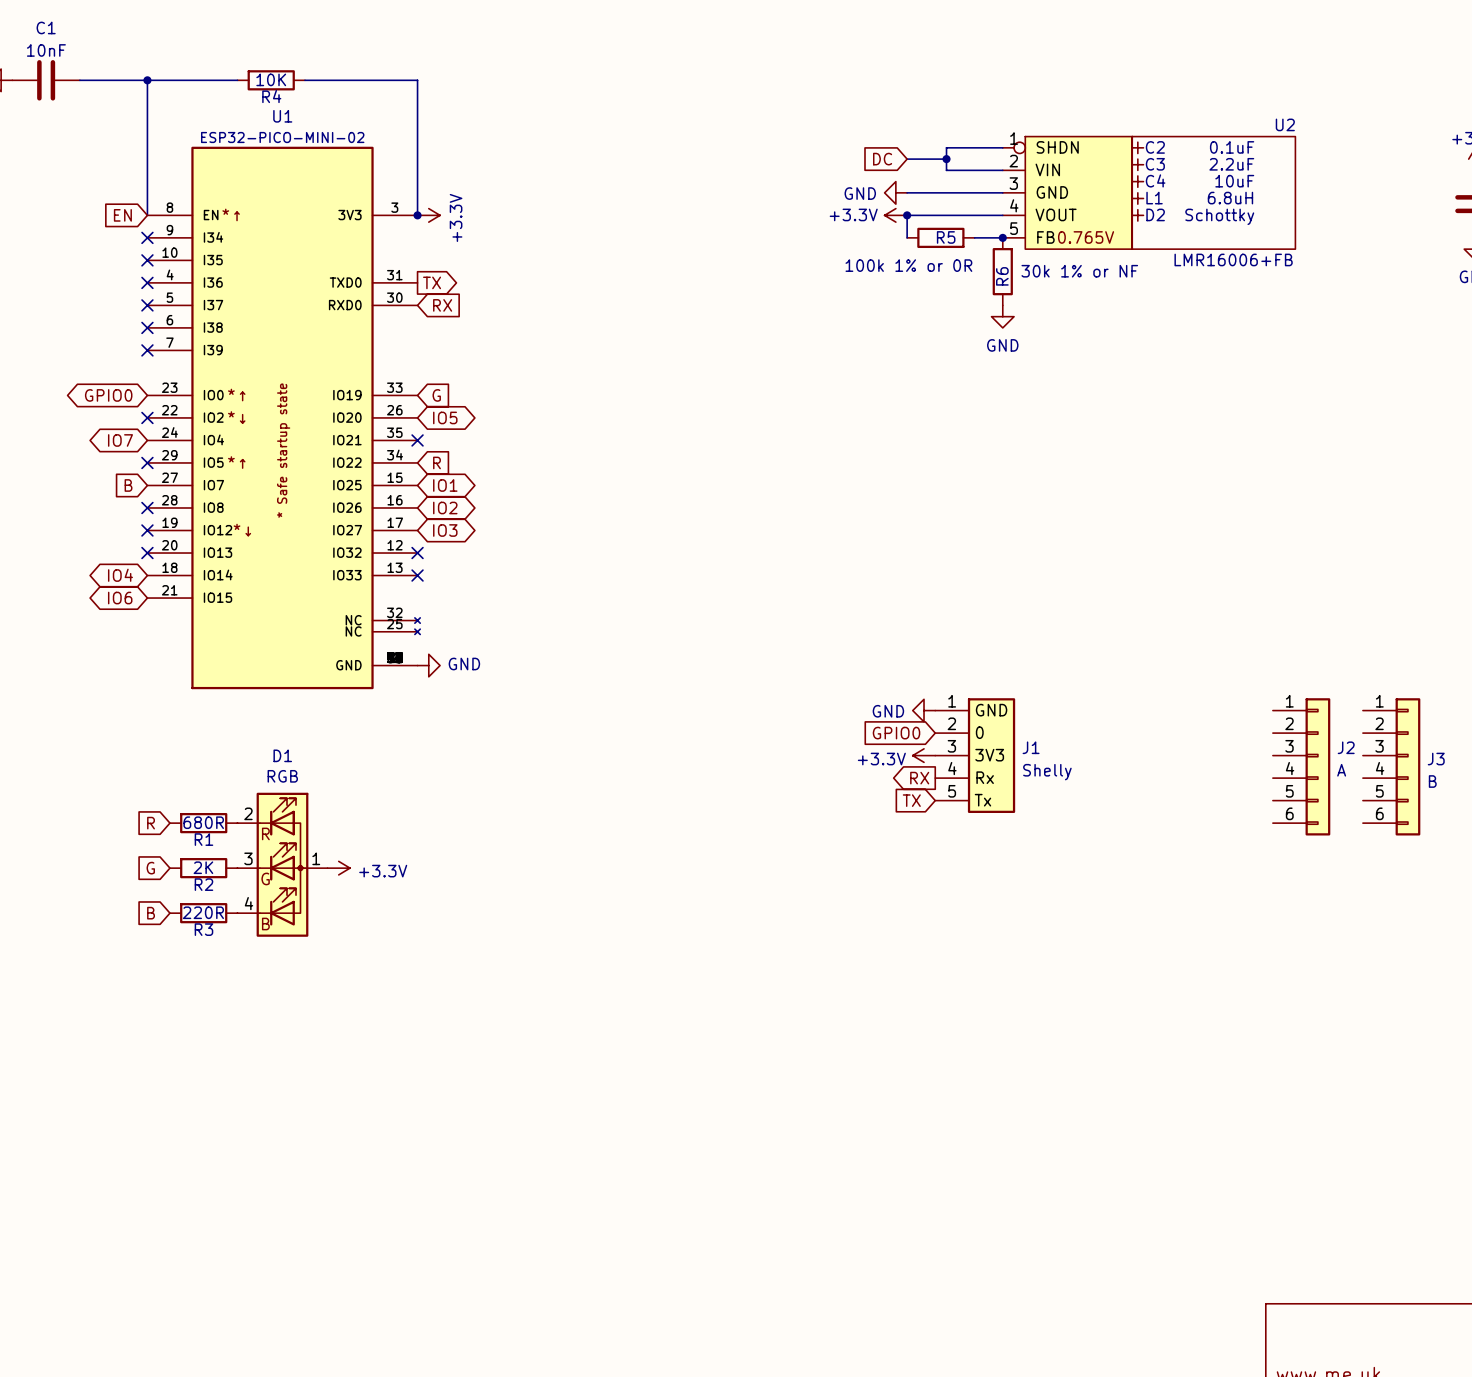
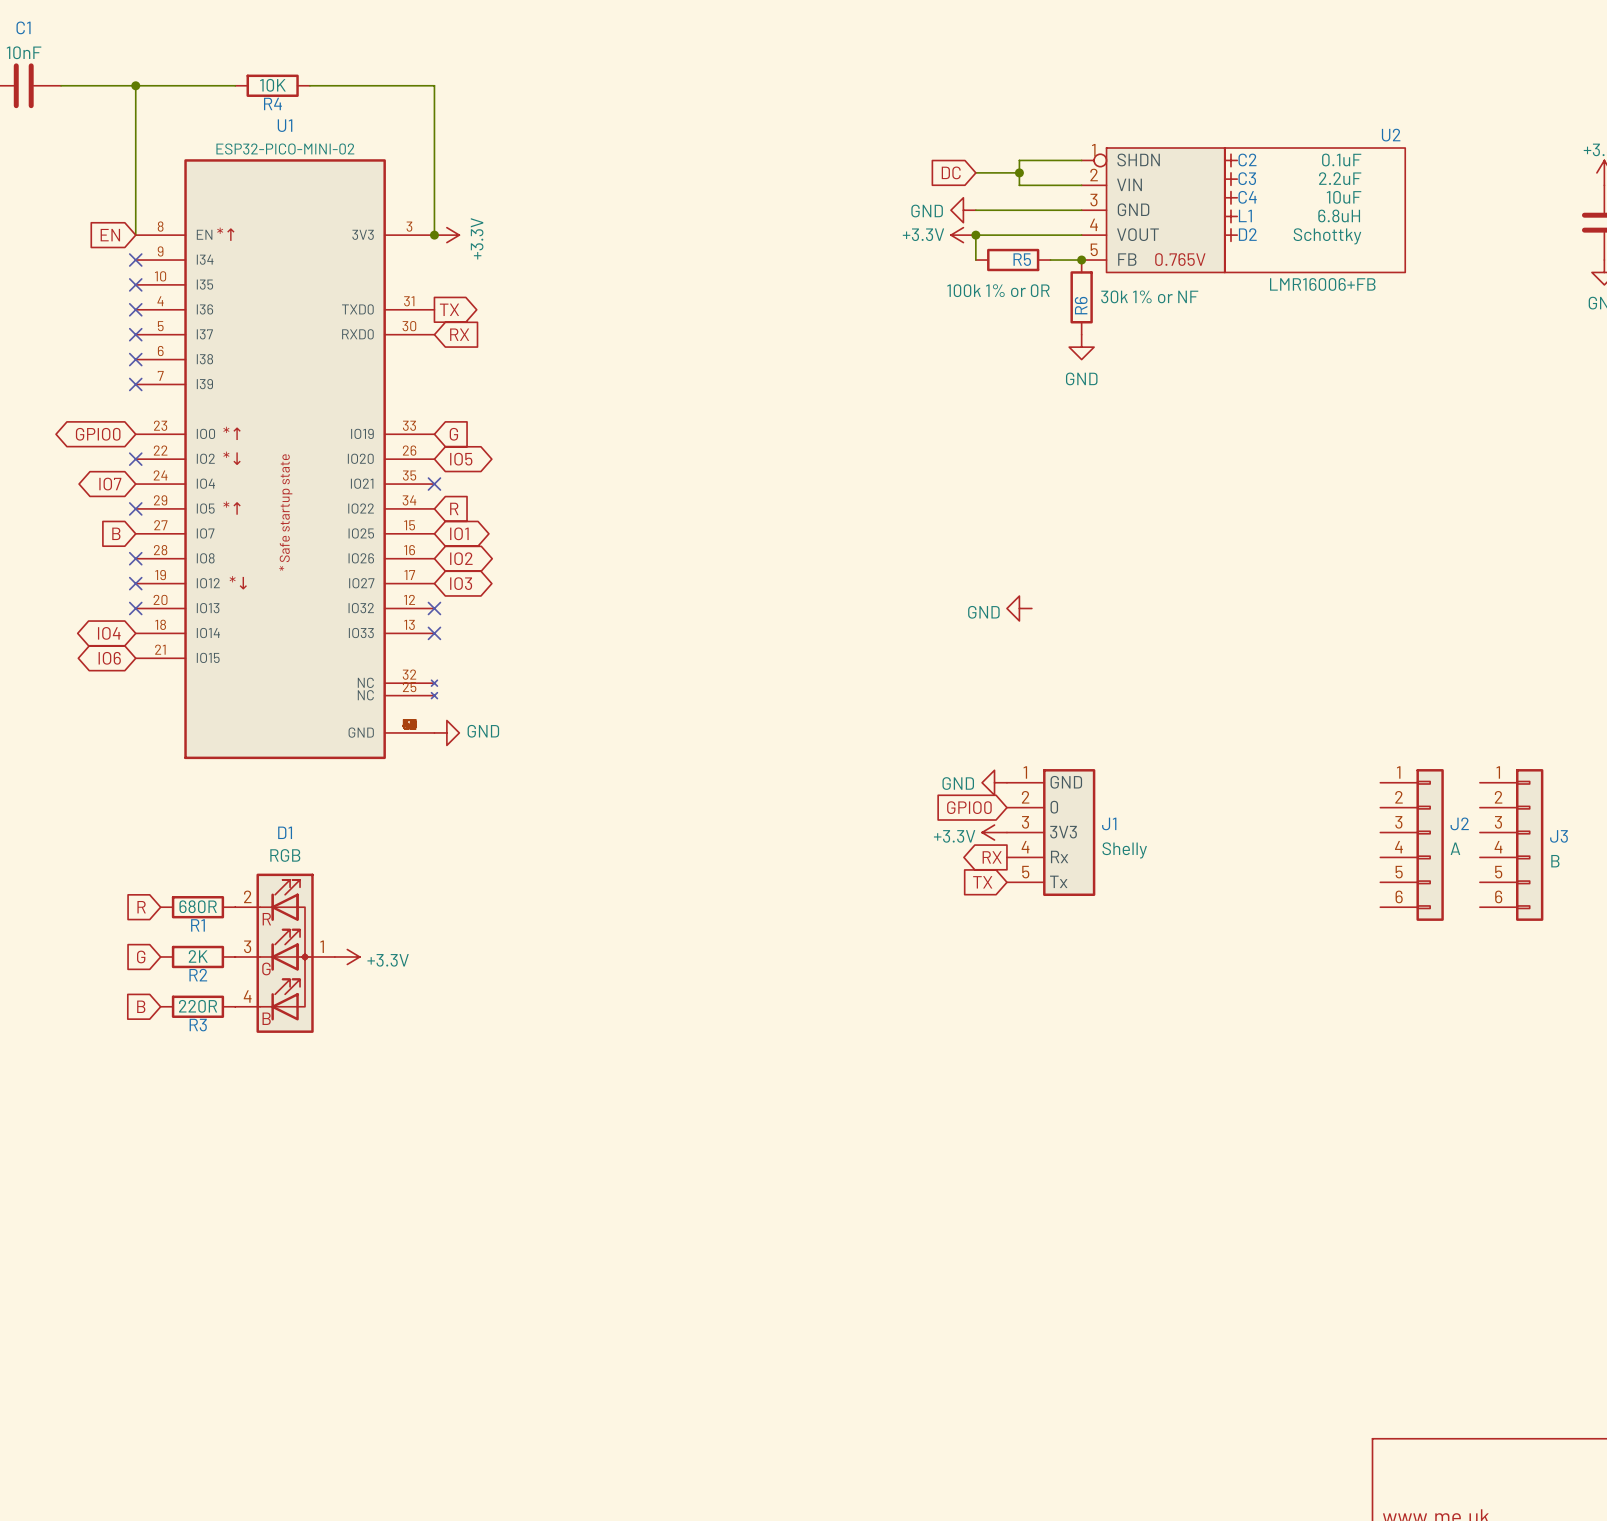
power symbol: none -> GND (1019, 608)

